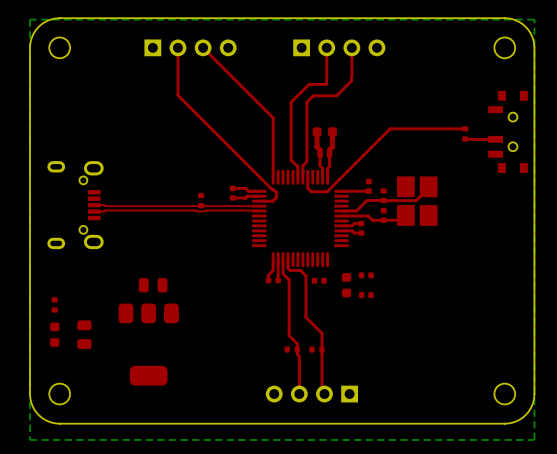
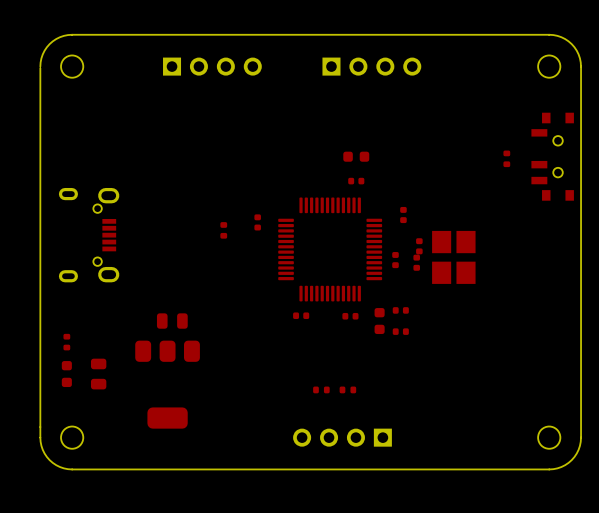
bottom zone outline: (534, 19) (30, 19) (30, 439) (534, 439) (534, 19) -> none
top track: (177, 47) (177, 95) (276, 192) (276, 197) (272, 201) (259, 201) -> none
top track: (203, 47) (273, 117) (273, 177) -> none
top track: (326, 47) (326, 84) (308, 84) (291, 102) (291, 160) (297, 166) (297, 177) -> none
top track: (351, 47) (351, 80) (336, 95) (313, 95) (306, 102) (306, 161) (302, 165) (302, 177) -> none
top track: (465, 128) (390, 128) (327, 191) (311, 191) (307, 188) (307, 177) -> none
top track: (317, 131) (316, 146) (320, 149) (320, 165) (322, 168) (322, 177) -> none
top track: (332, 131) (332, 146) (329, 149) (327, 177) -> none
top track: (465, 138) (495, 139) -> none
top track: (428, 186) (416, 200) (366, 200) (356, 211) (341, 211) -> none
top track: (232, 188) (245, 188) (248, 191) (259, 191) -> none
top track: (368, 191) (341, 191) -> none
part position: (383, 195) -> (416, 262)
top track: (259, 196) (232, 198) -> none
part position: (417, 201) -> (453, 257)
top track: (94, 205) (259, 206) -> none
top track: (259, 211) (94, 211) -> none
top track: (405, 215) (401, 220) (372, 220) (368, 216) (341, 216) -> none
top track: (361, 223) (341, 225) -> none
top track: (341, 230) (361, 233) -> none
top track: (273, 259) (273, 270) (268, 275) (268, 280) -> none
top track: (278, 259) (278, 280) -> none
top track: (283, 259) (283, 273) (289, 279) (289, 335) (297, 343) (297, 354) (299, 356) (299, 394) -> none
top track: (288, 259) (288, 268) (290, 270) (300, 270) (305, 275) (305, 317) (321, 333) (321, 391) (324, 394) -> none

